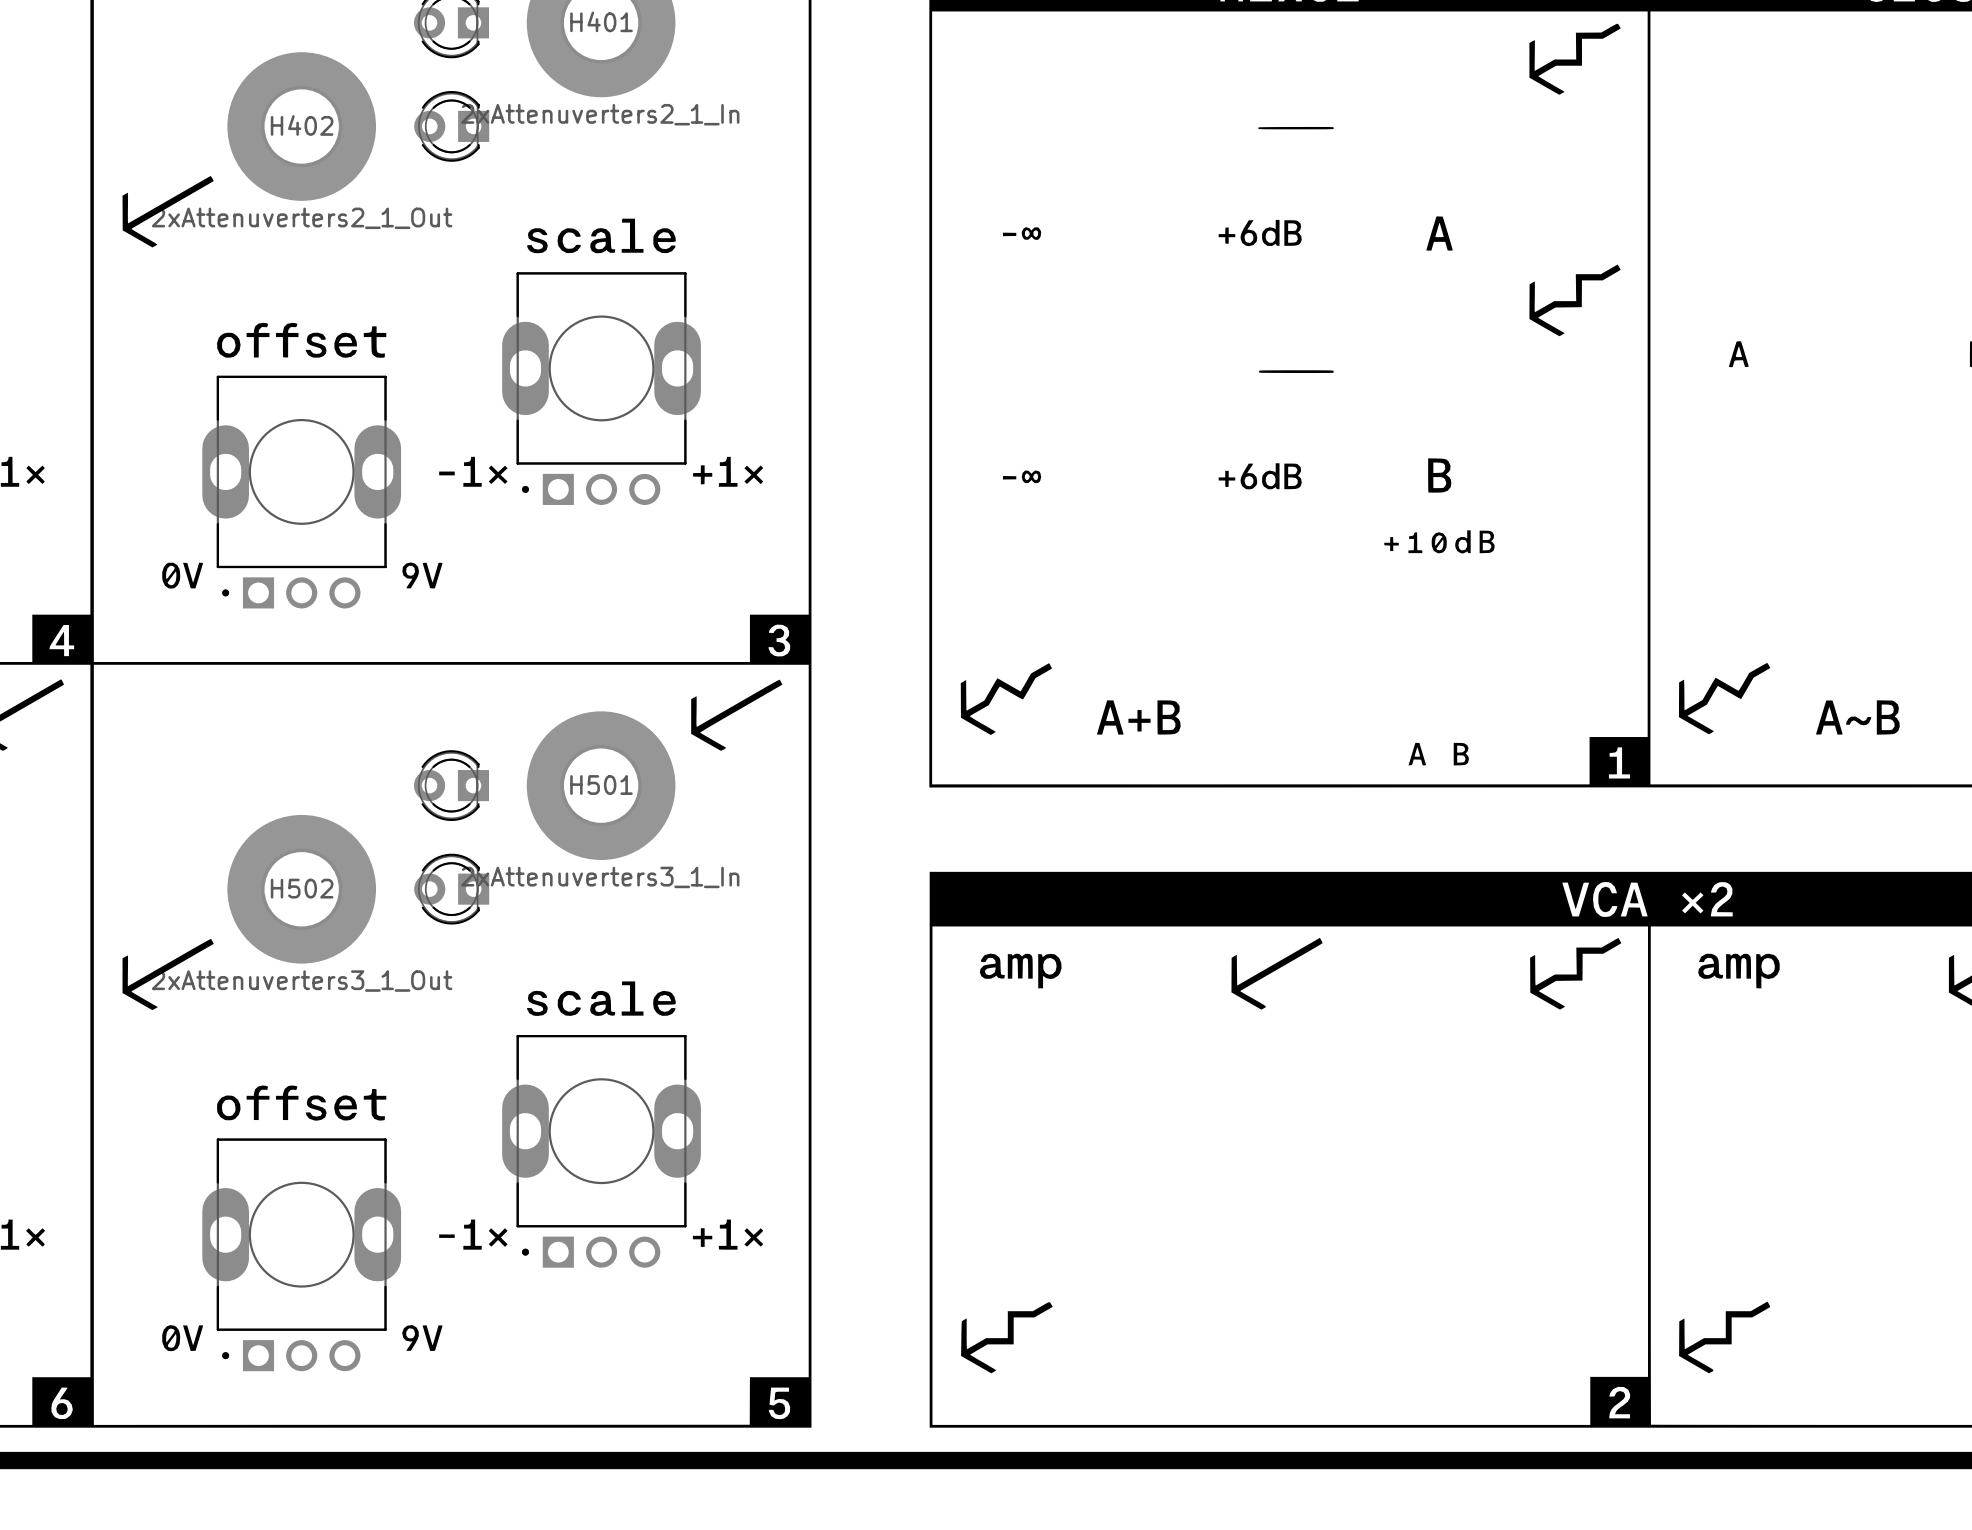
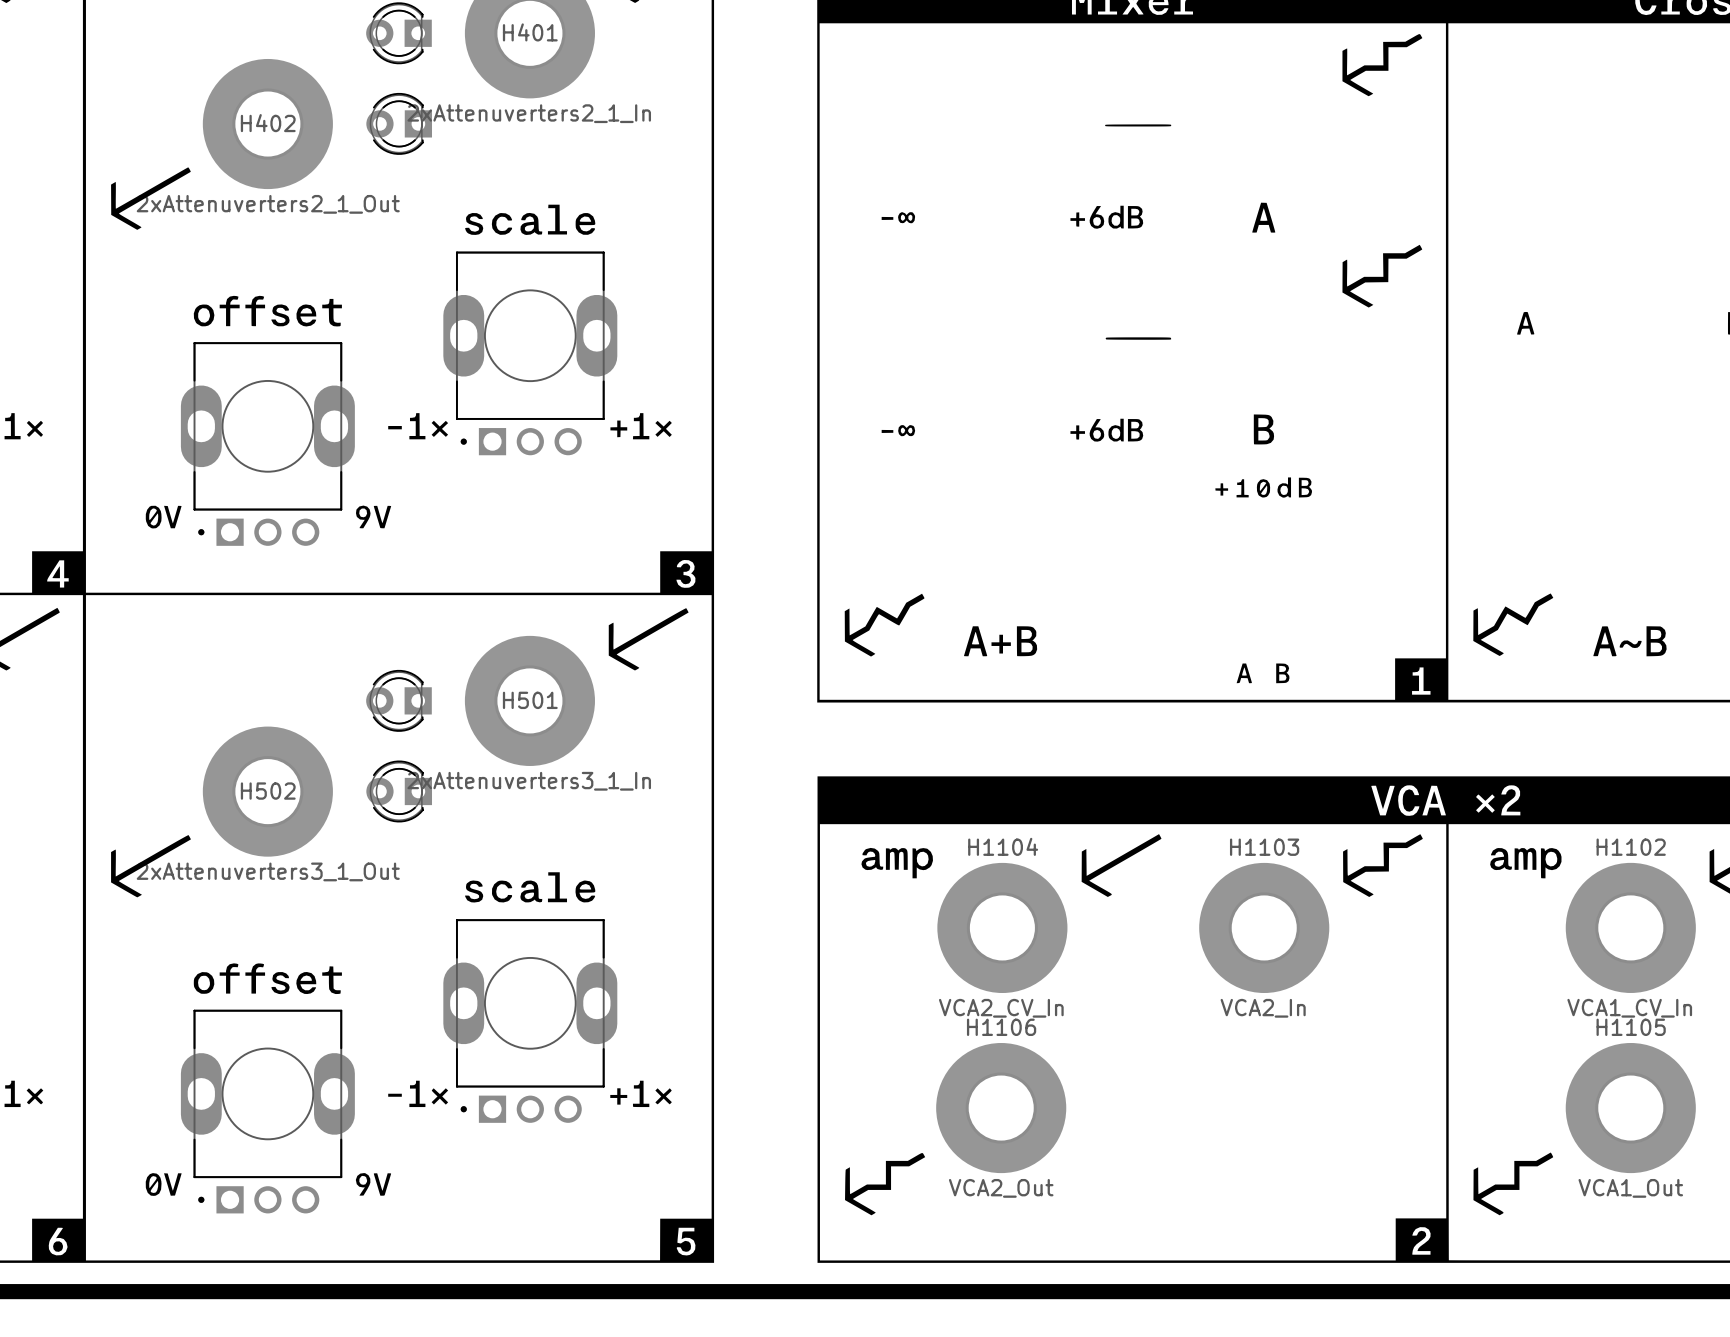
H1104: none -> VCA2_CV_In (1002, 927)
H1103: none -> VCA2_In (1264, 927)
H1102: none -> VCA1_CV_In (1630, 927)
H1106: none -> VCA2_Out (1001, 1108)
H1105: none -> VCA1_Out (1630, 1108)

